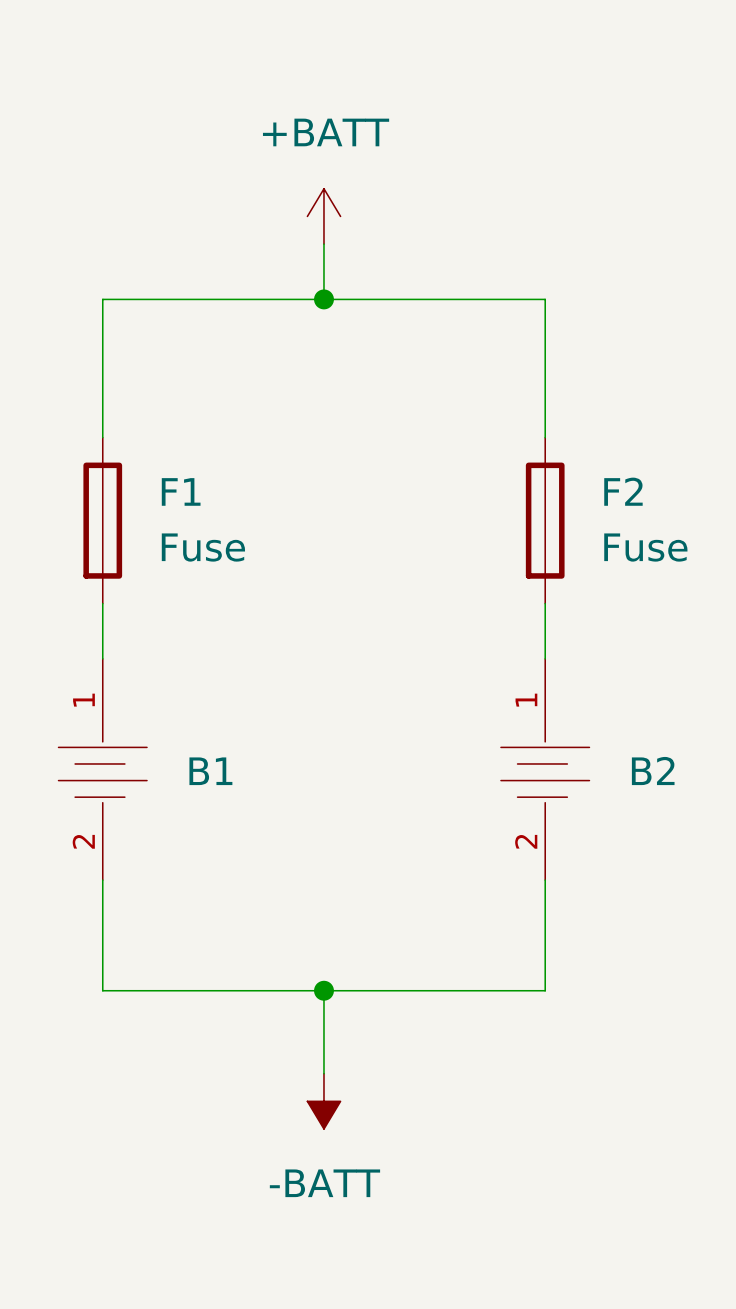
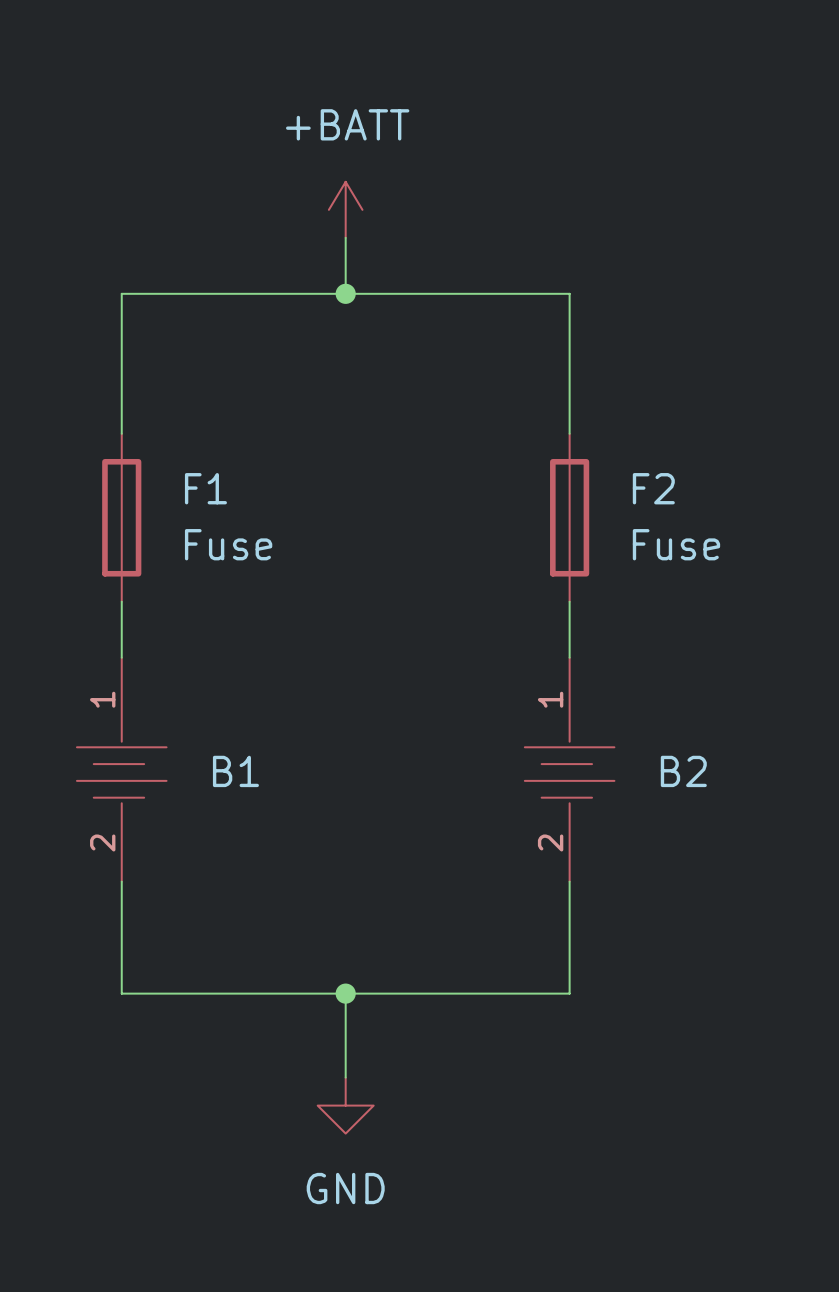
power symbol: -BATT (323, 1101) -> GND (345, 1105)

